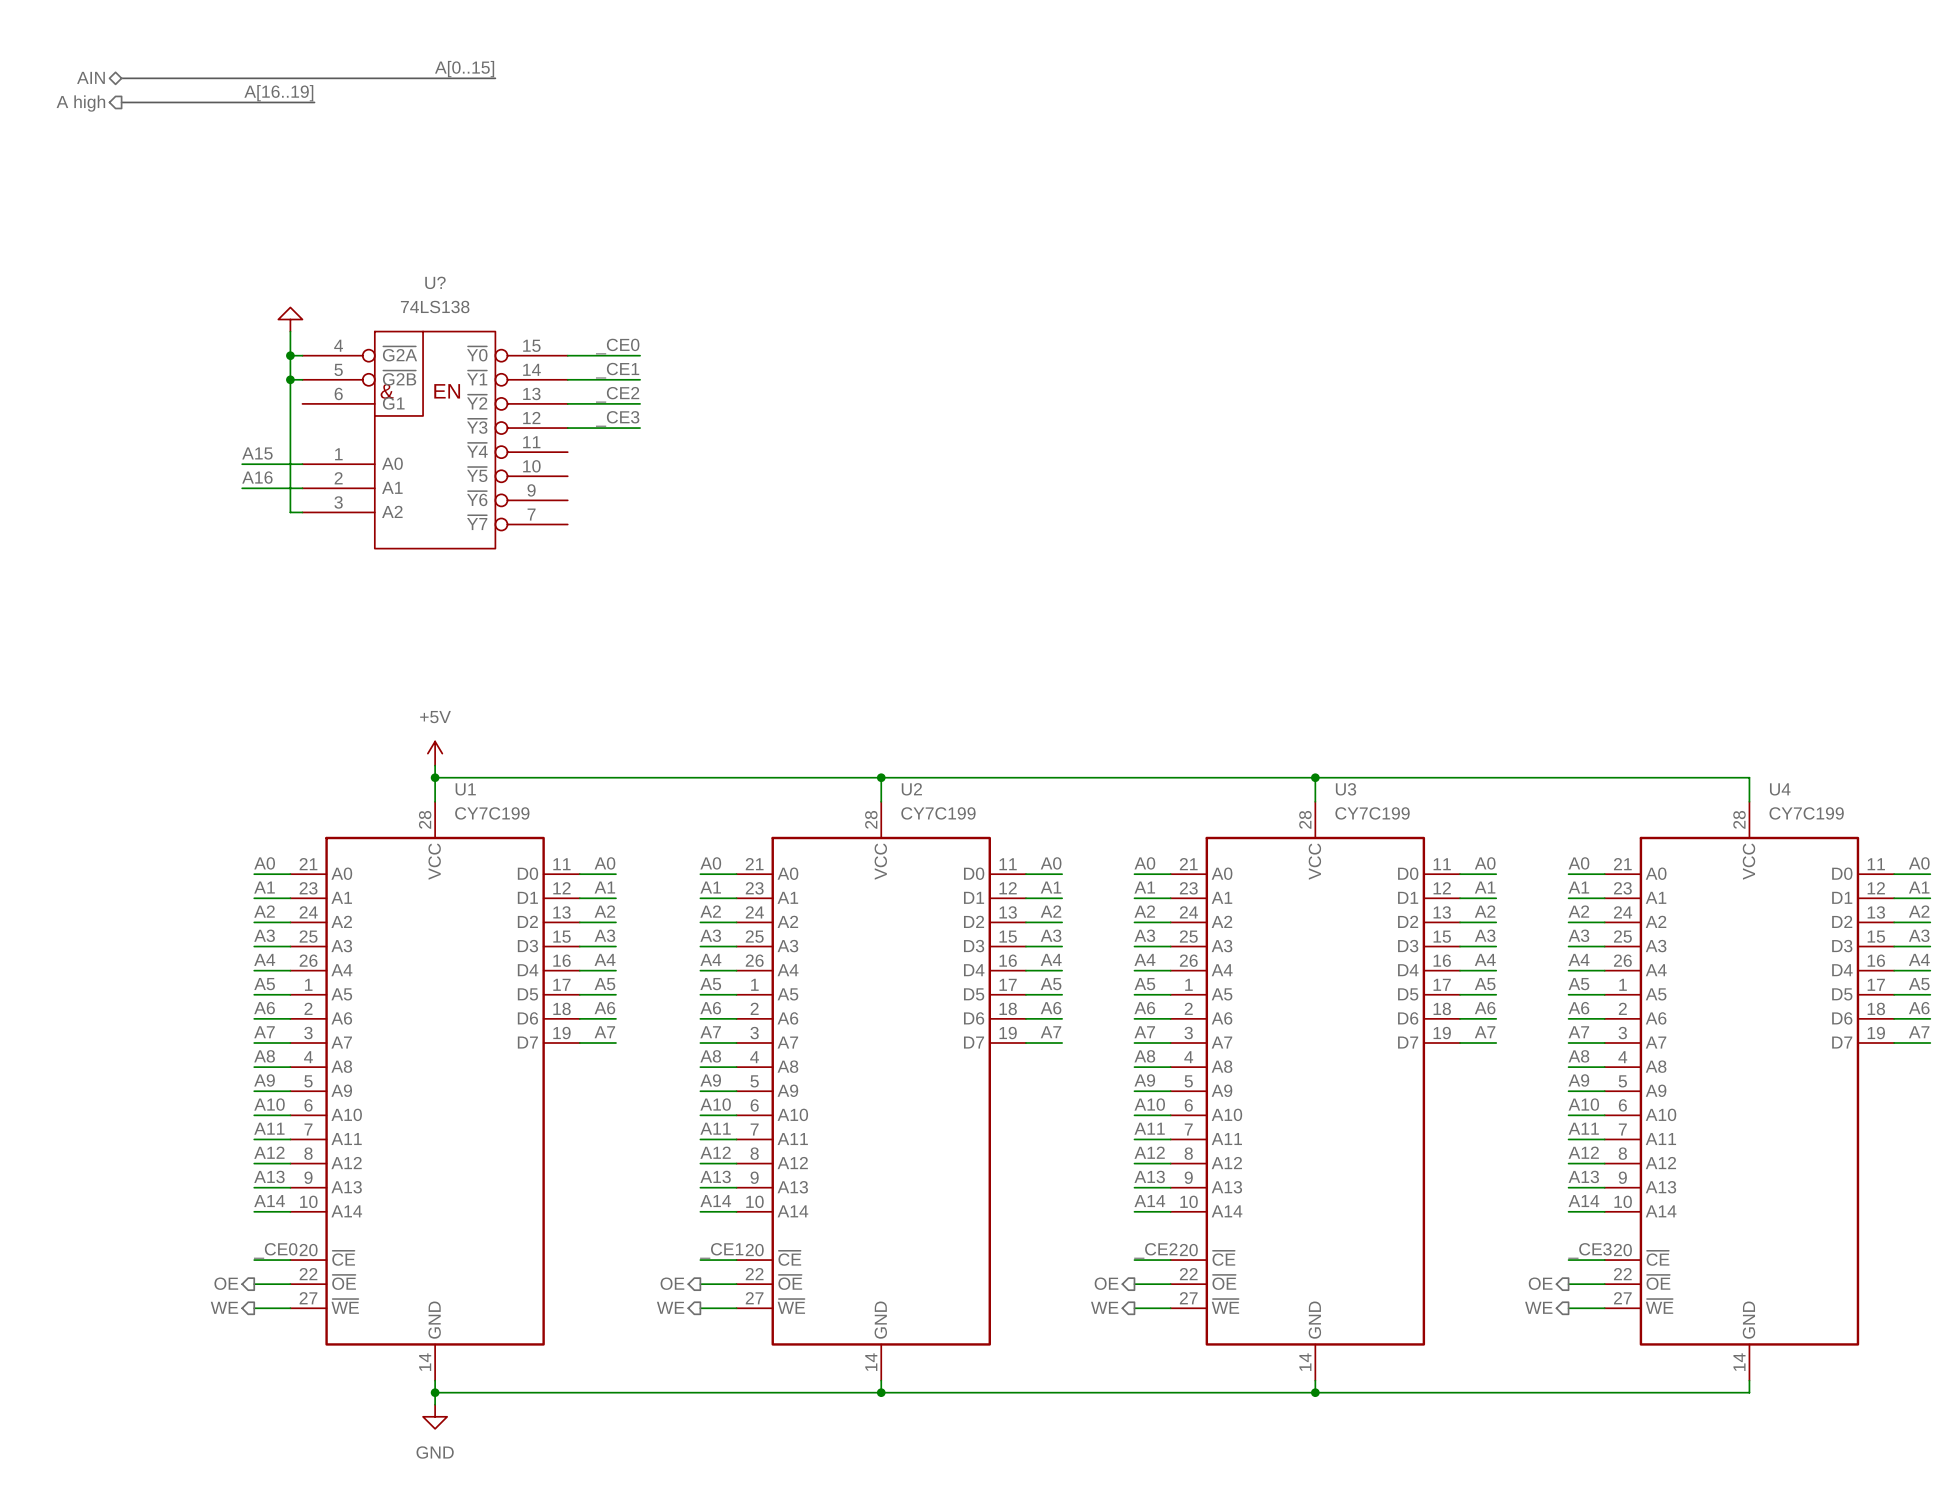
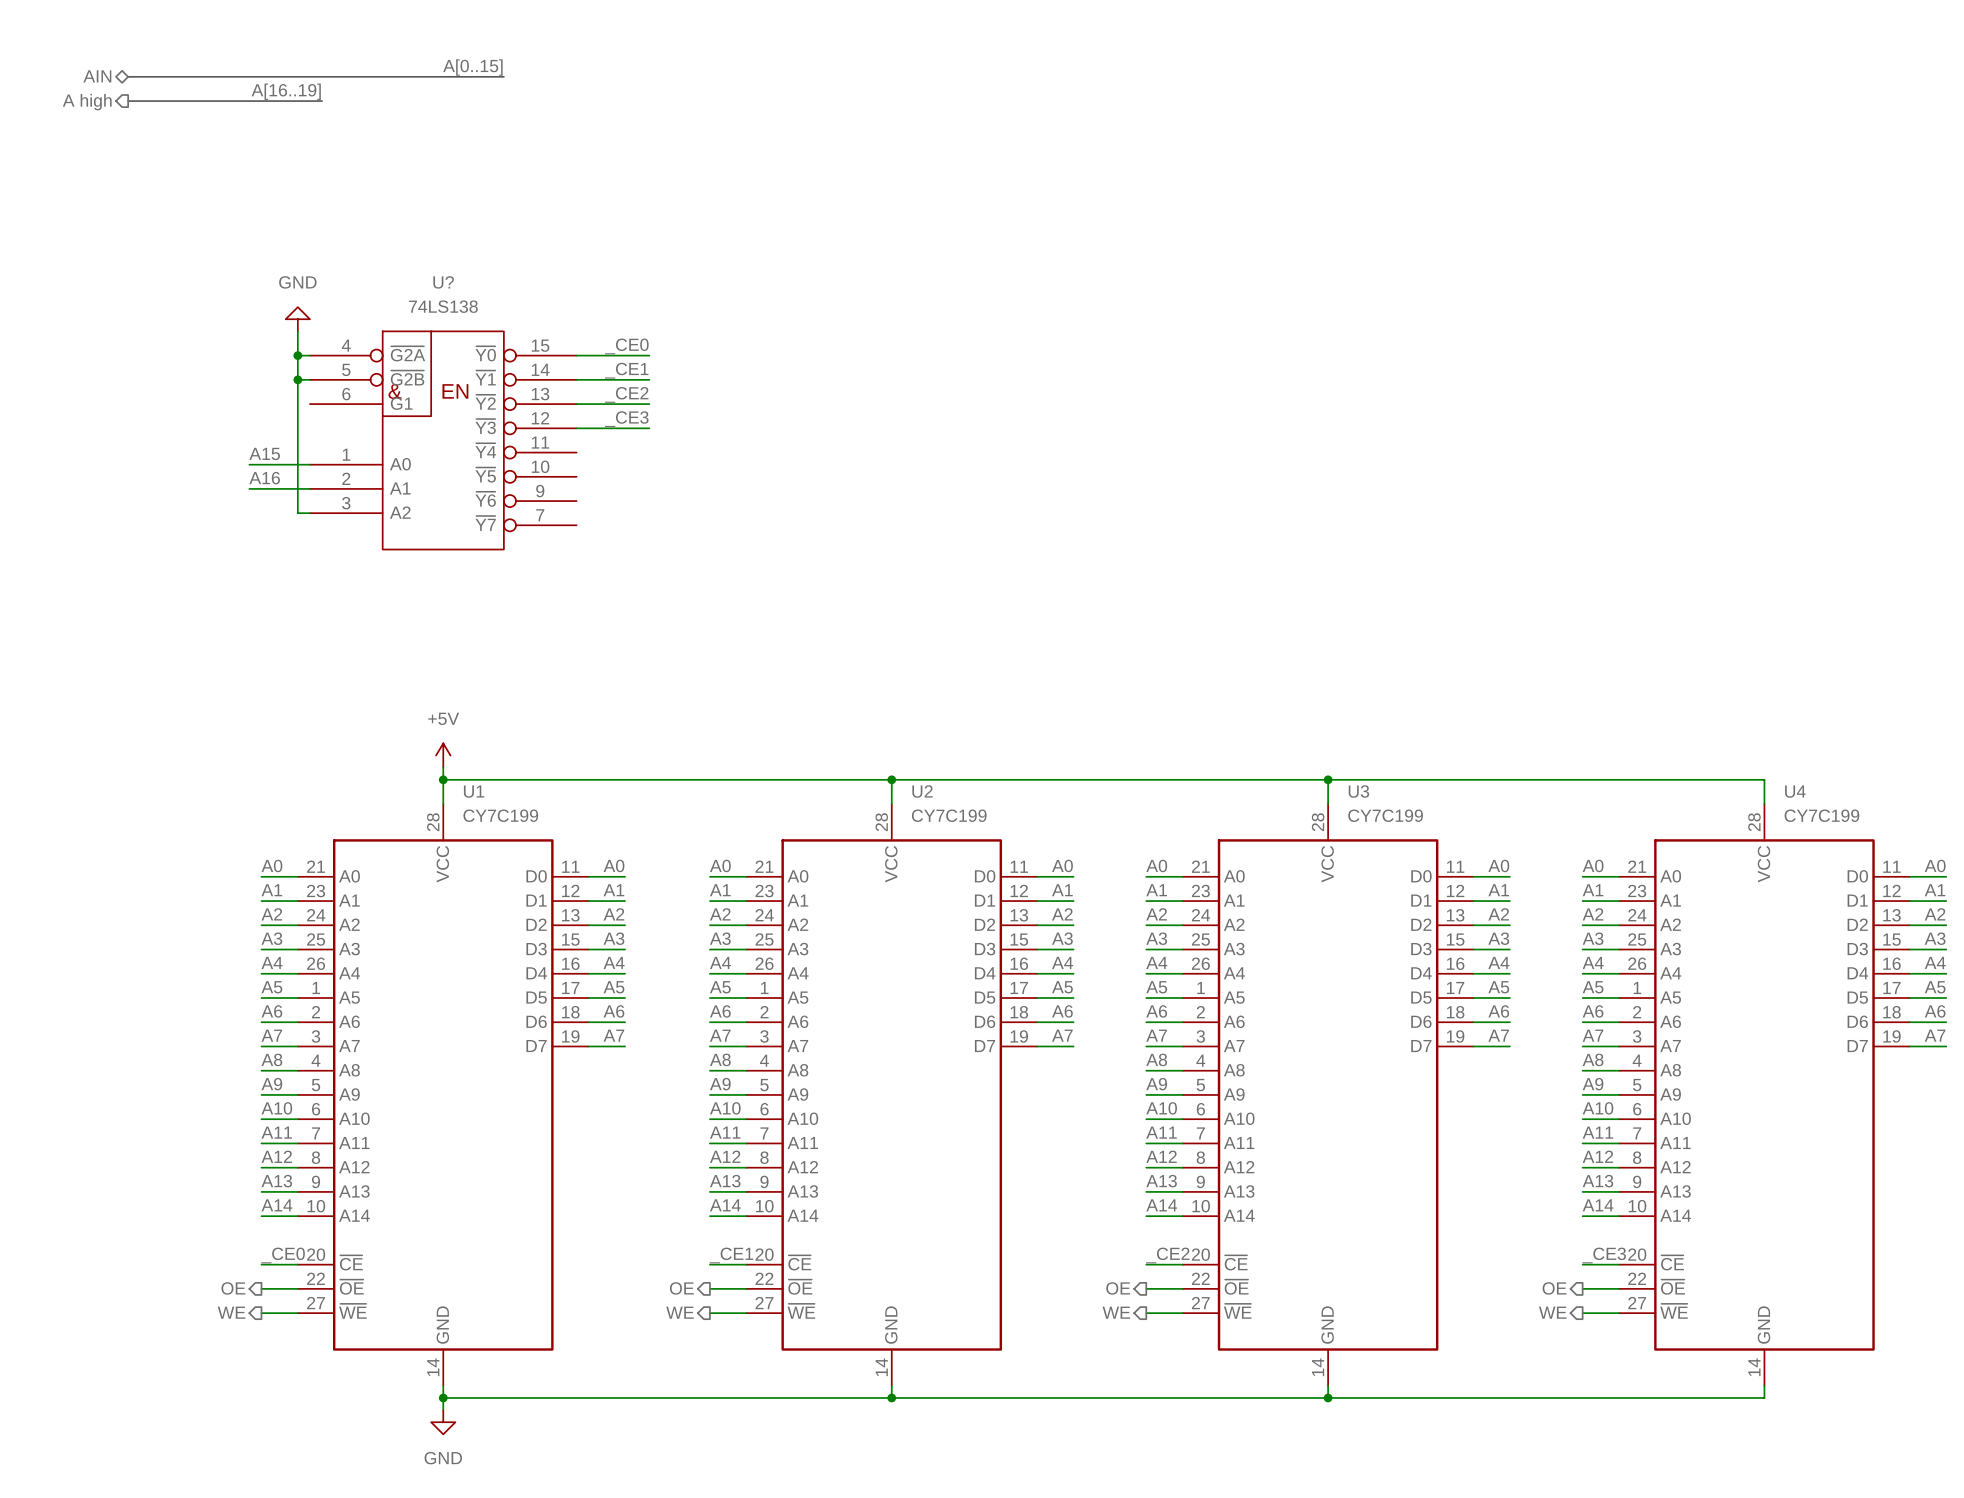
power symbol text: none -> GND (297, 282)

